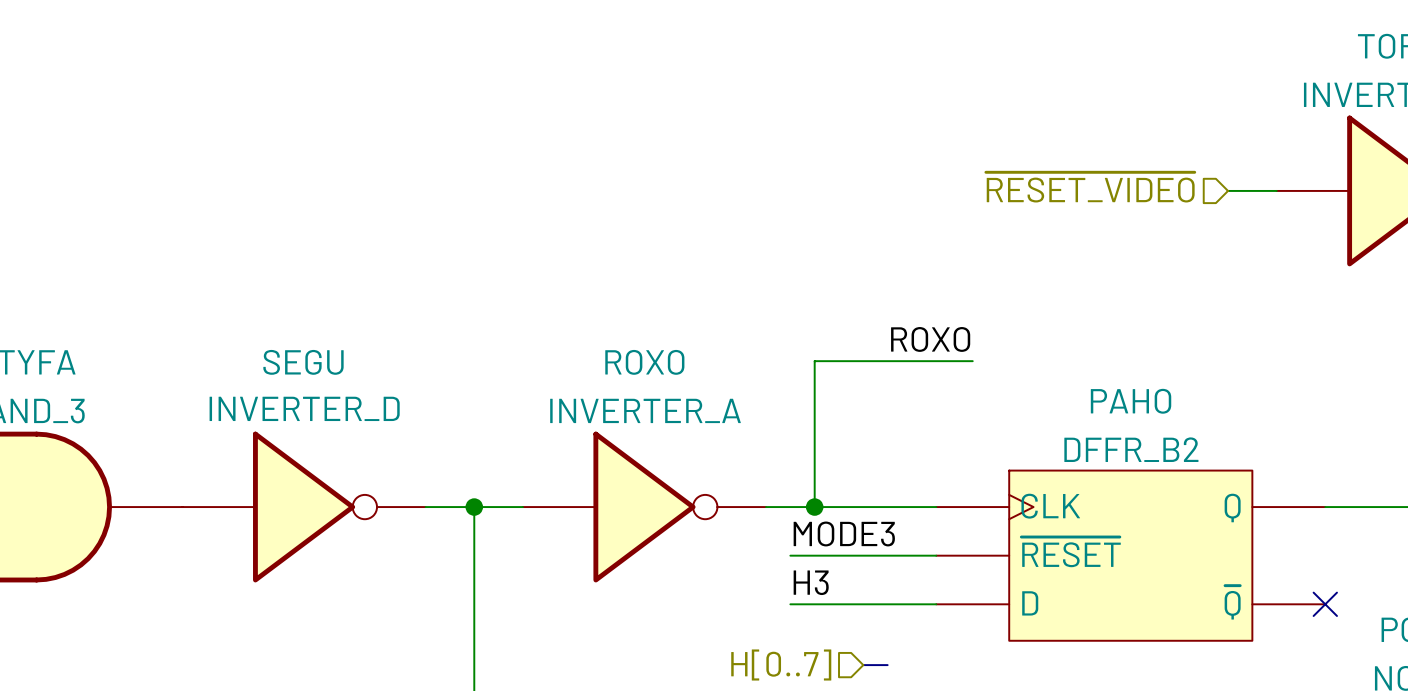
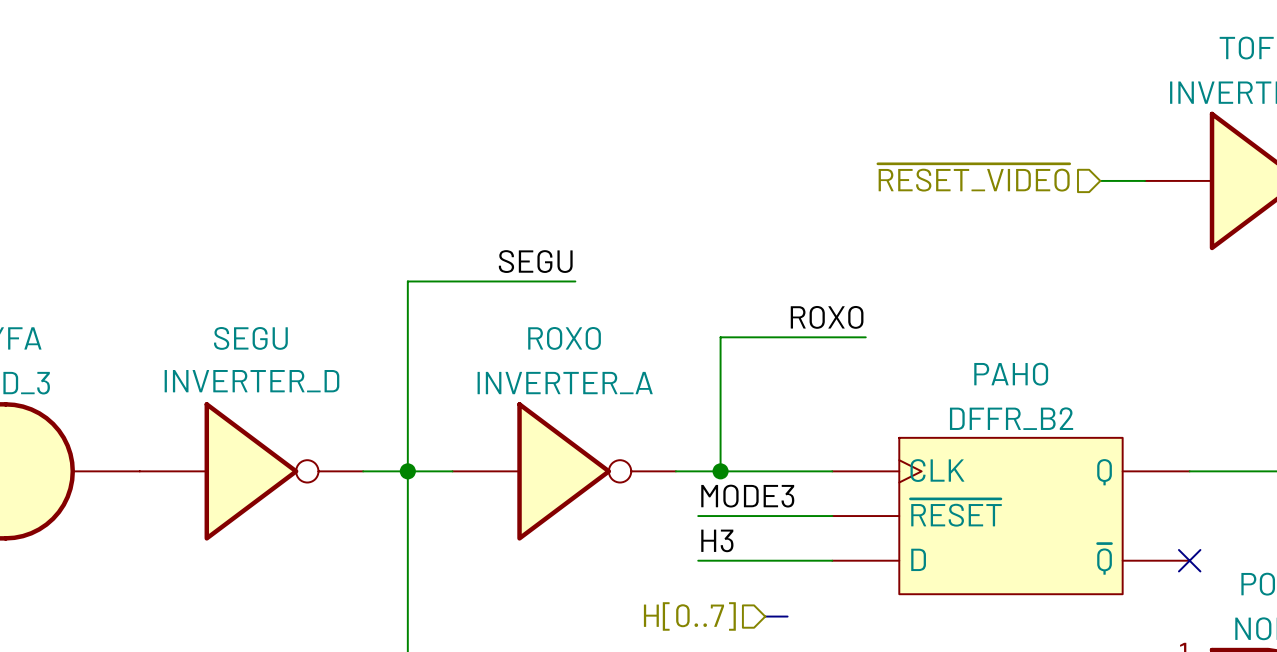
label: none -> SEGU (535, 261)
wire: none -> (575, 281) (407, 281) (407, 471)

